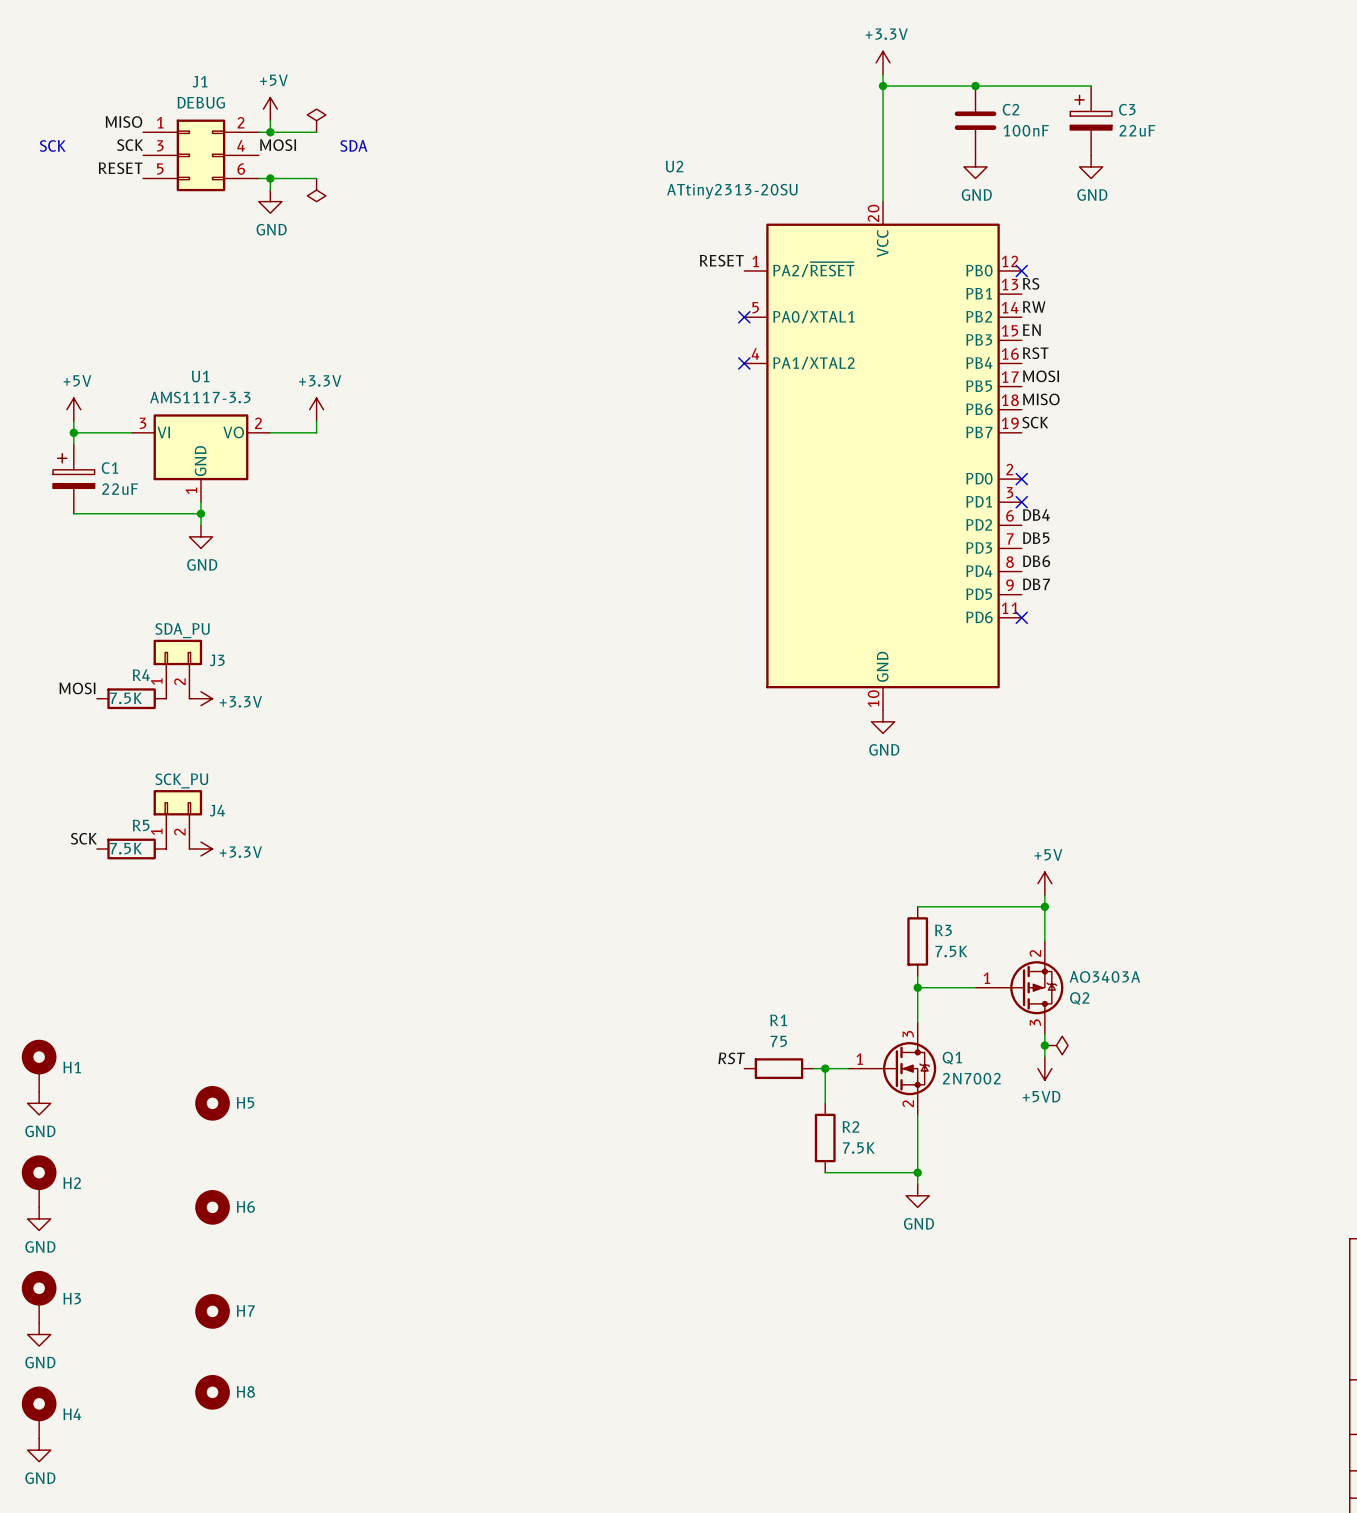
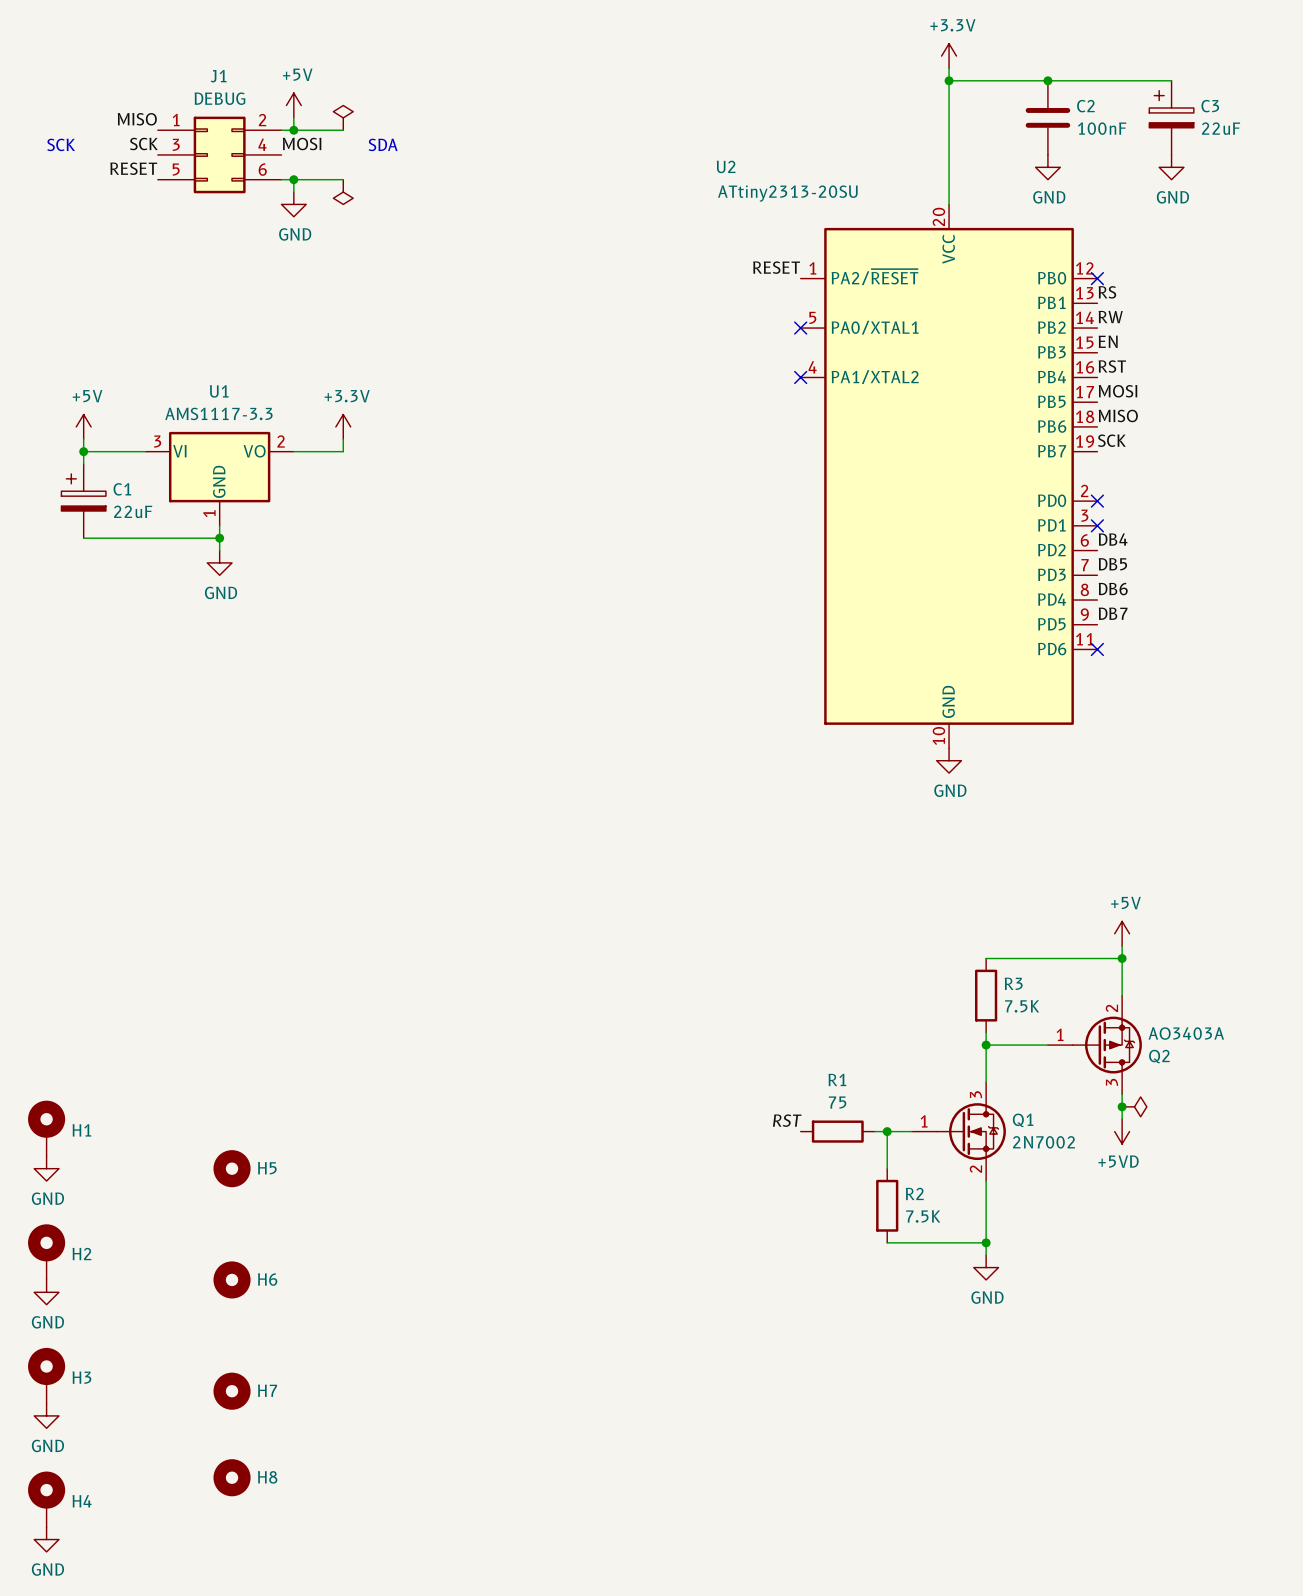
J3: SDA_PU (177, 669) -> none
label: MOSI (77, 688) -> none
R4: 7.5K (131, 698) -> none
power symbol: +3.3V (200, 698) -> none
J4: SCK_PU (177, 819) -> none
label: SCK (83, 838) -> none
R5: 7.5K (131, 848) -> none
power symbol: +3.3V (200, 848) -> none

